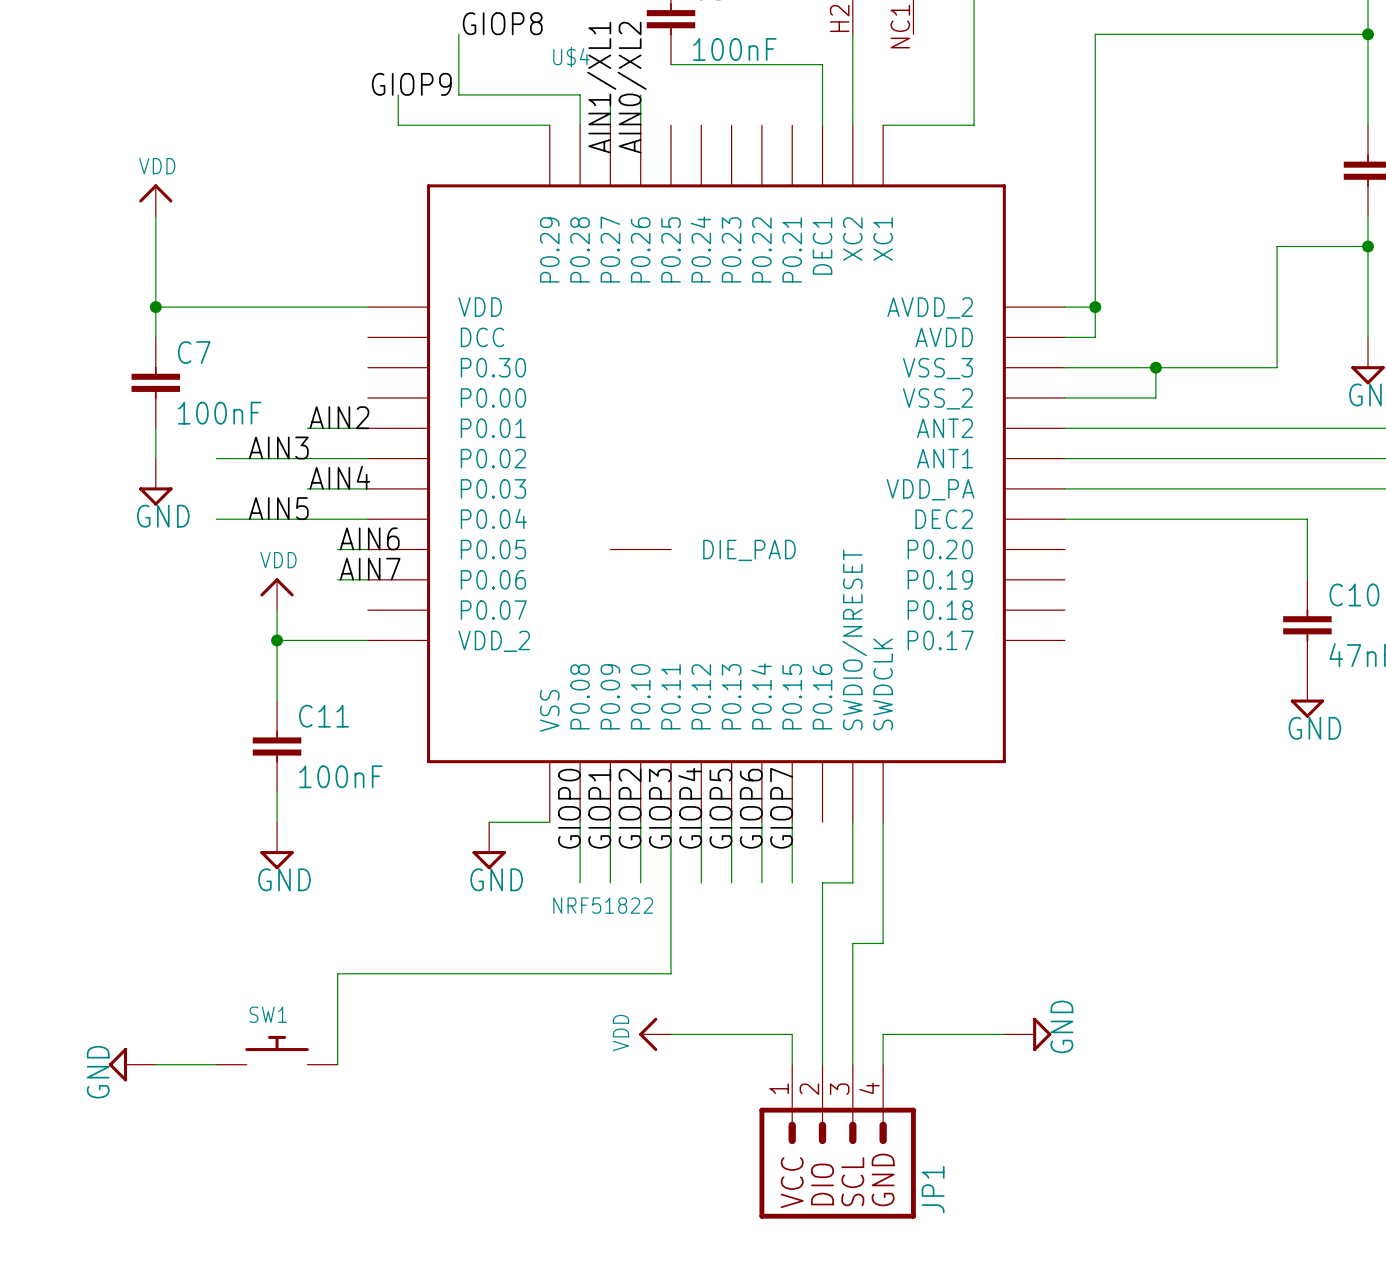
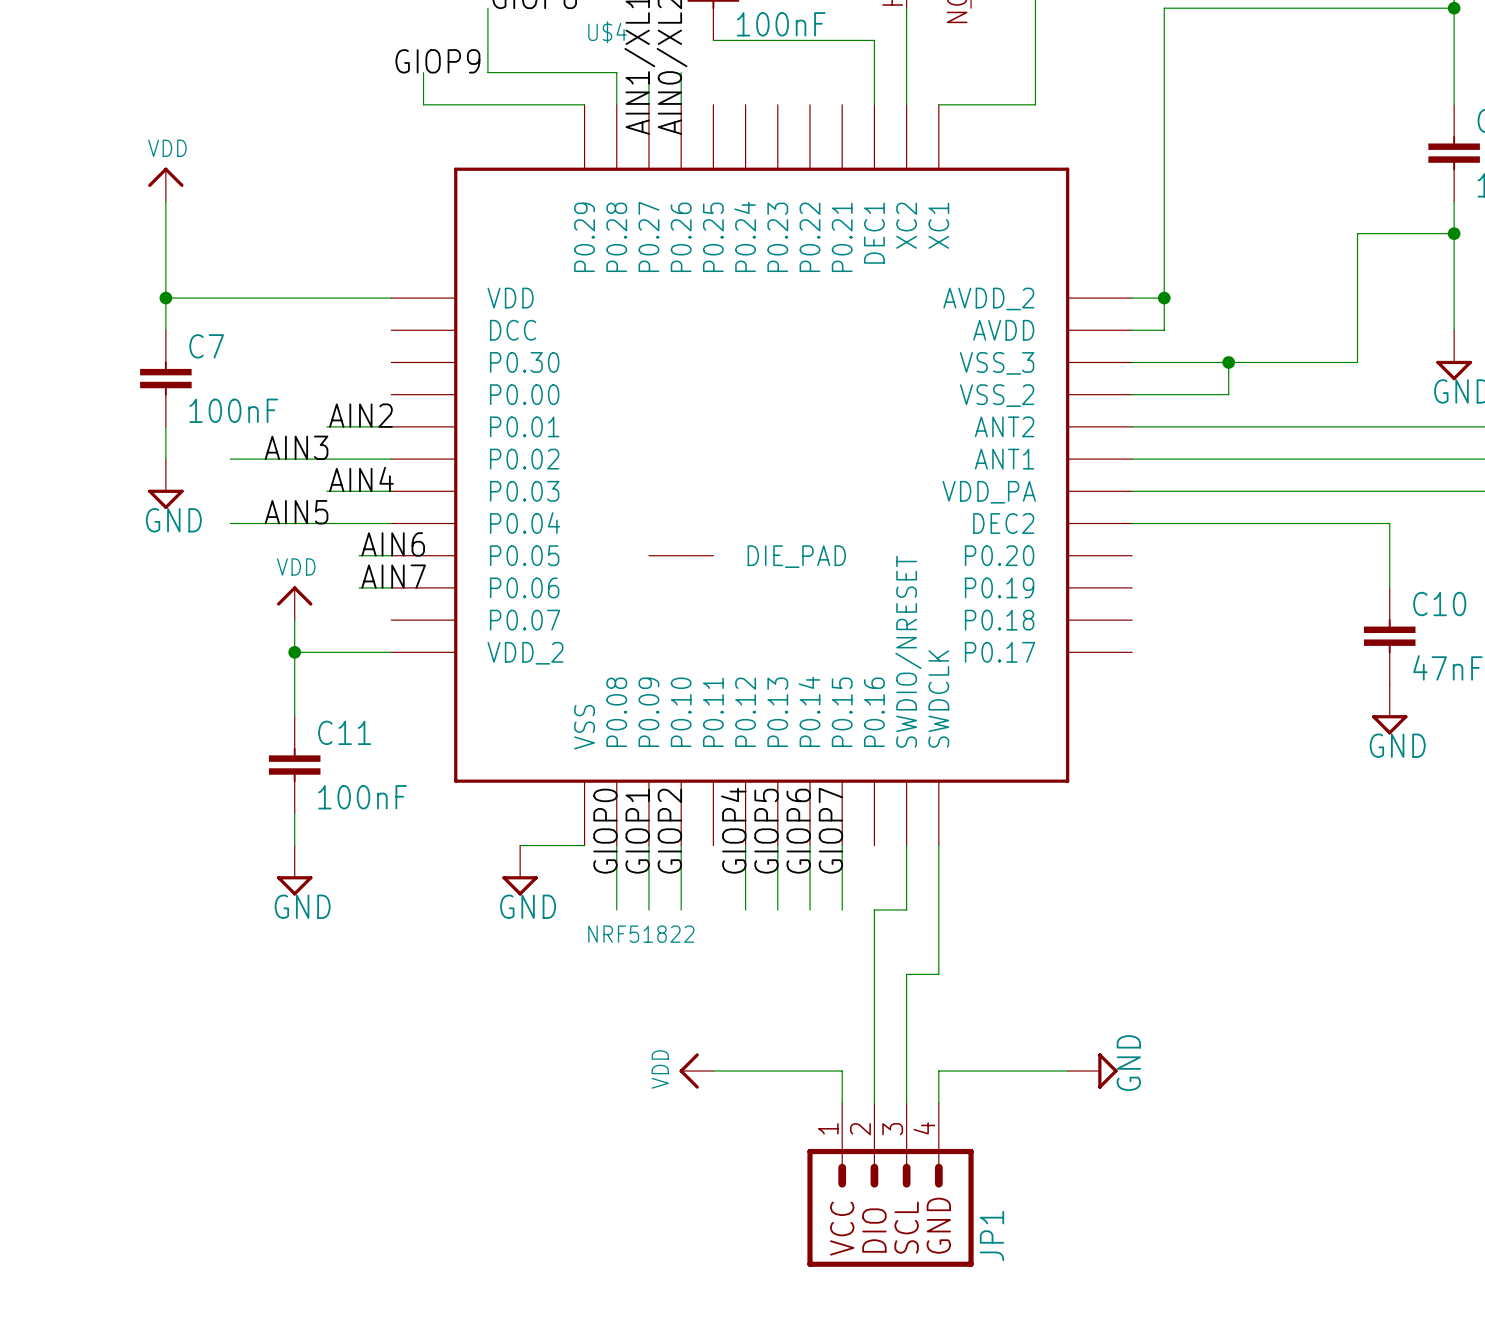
label: GIOP3 (660, 808) -> none
wire: (670, 822) (670, 973) (337, 973) (337, 1064) -> none
SW1: (277, 1050) -> none
power symbol: GND (132, 1064) -> none
wire: (155, 1064) (216, 1064) -> none

